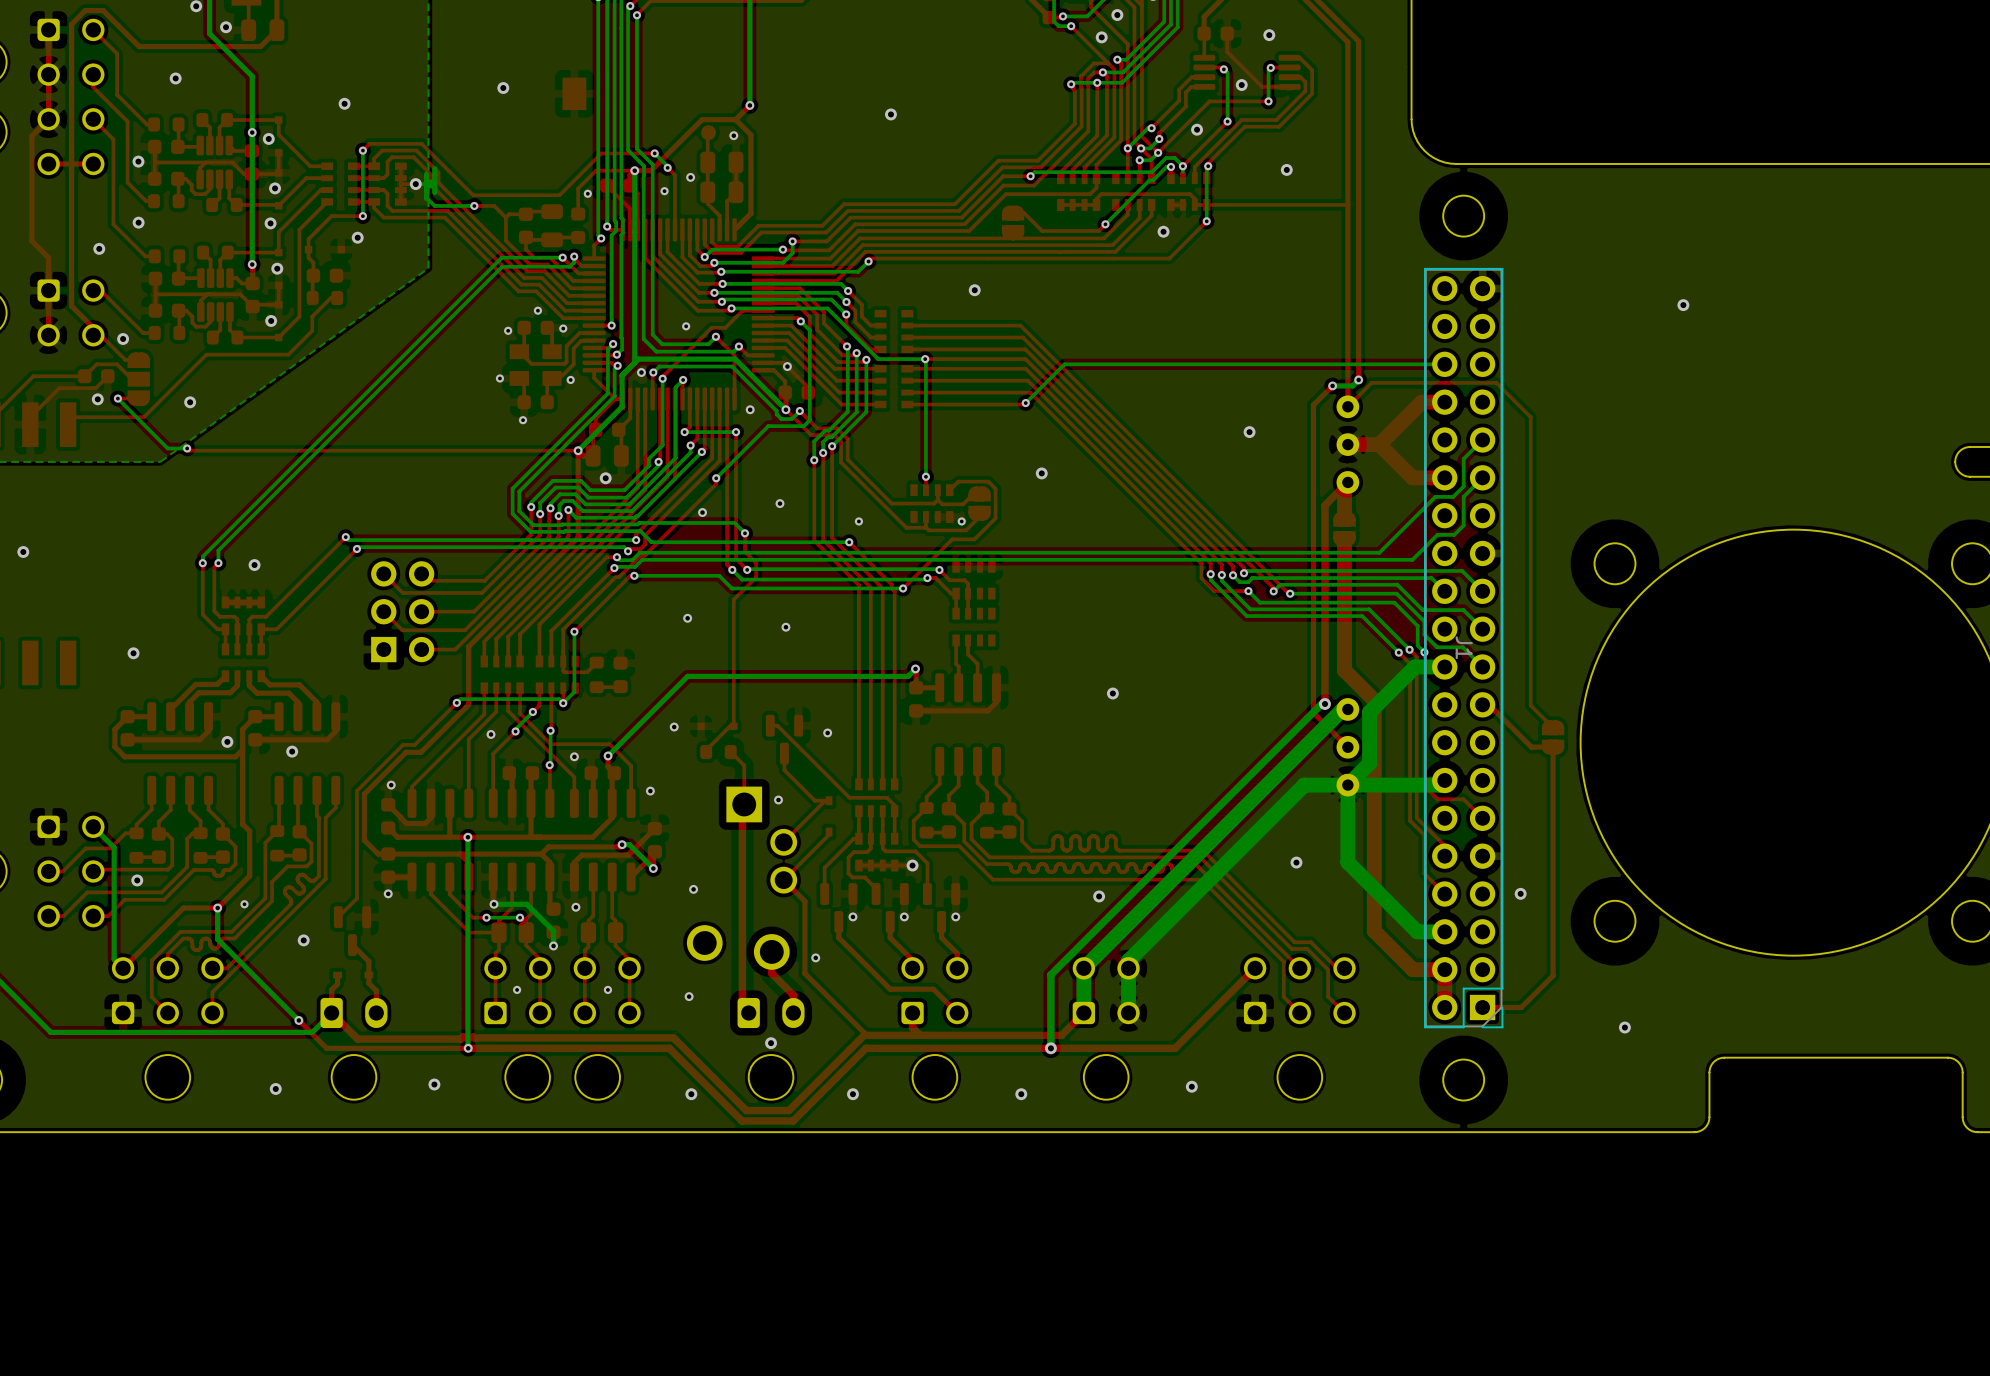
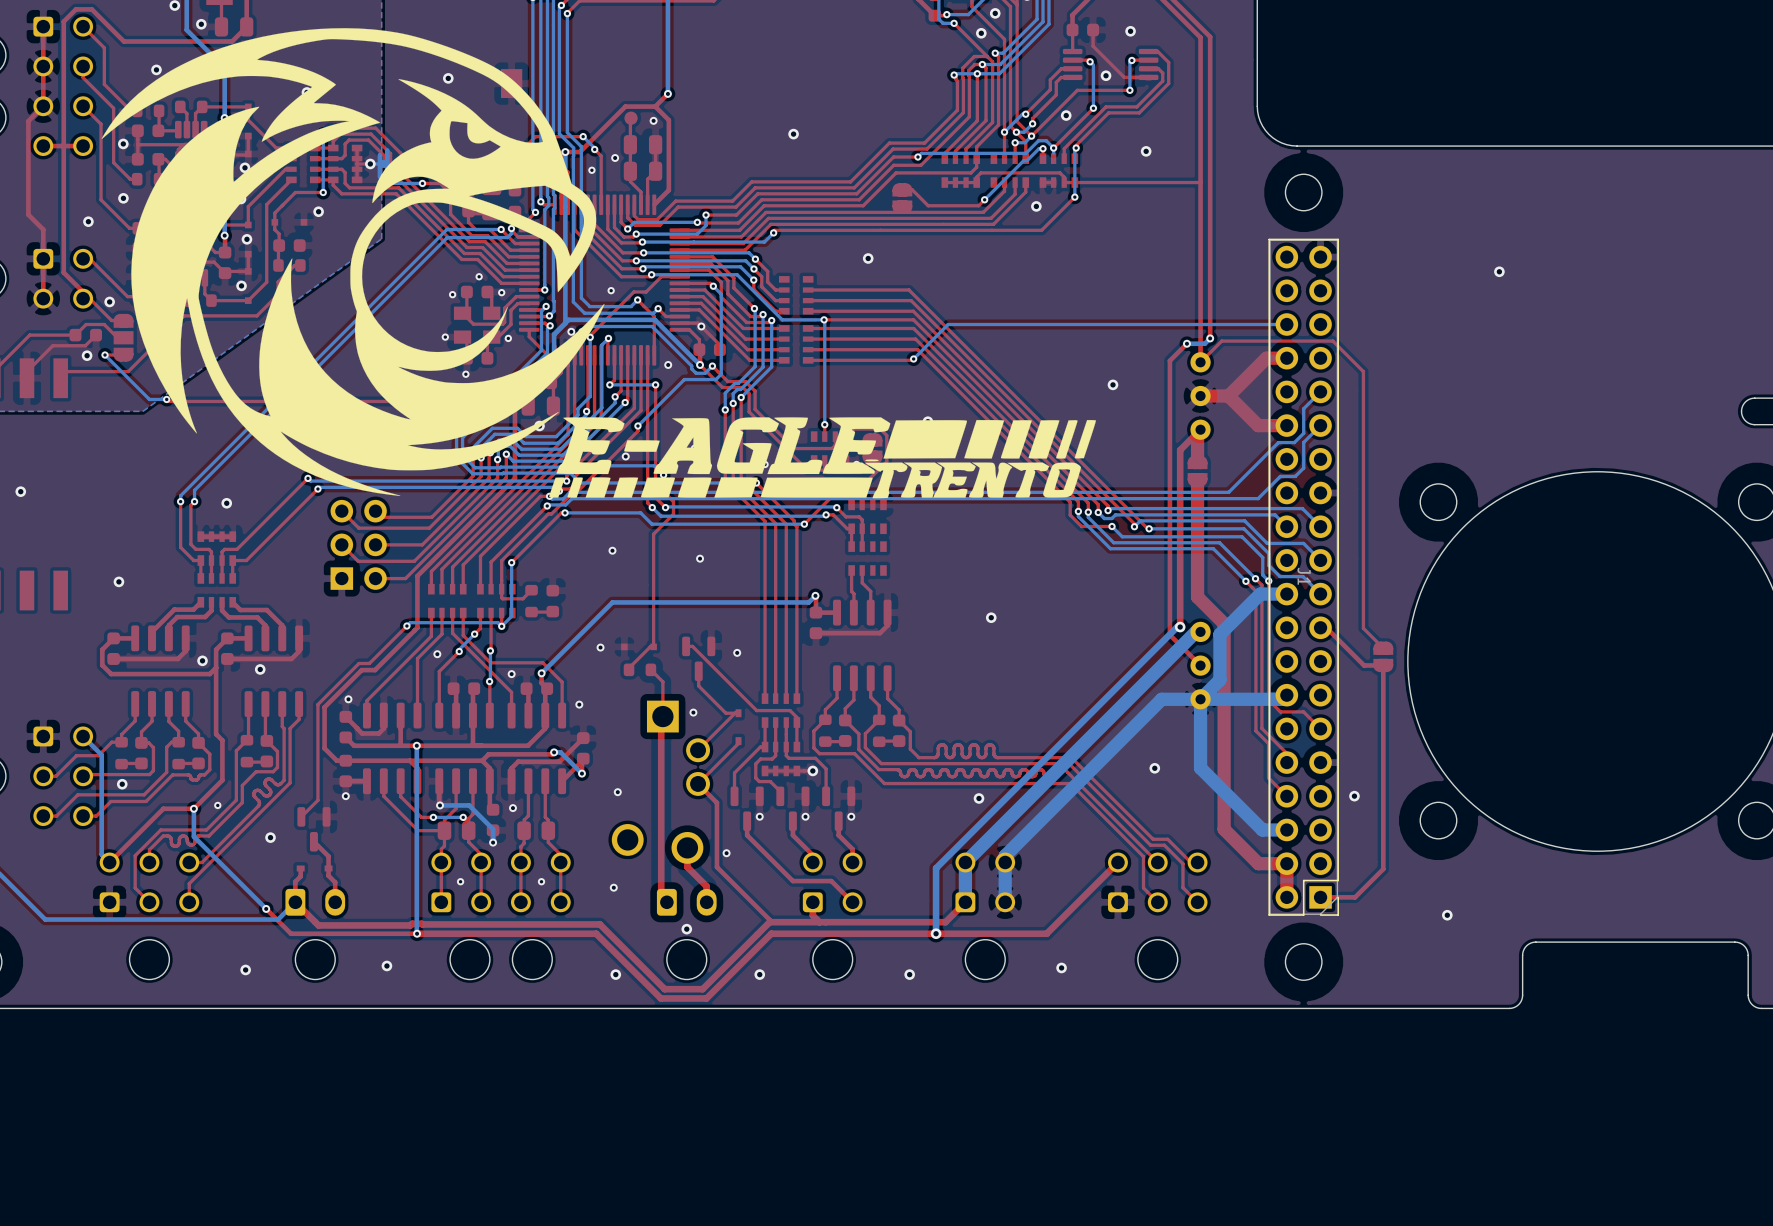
drawing: none -> [101, 28, 1096, 499]
via position: (890, 114) -> (793, 134)

